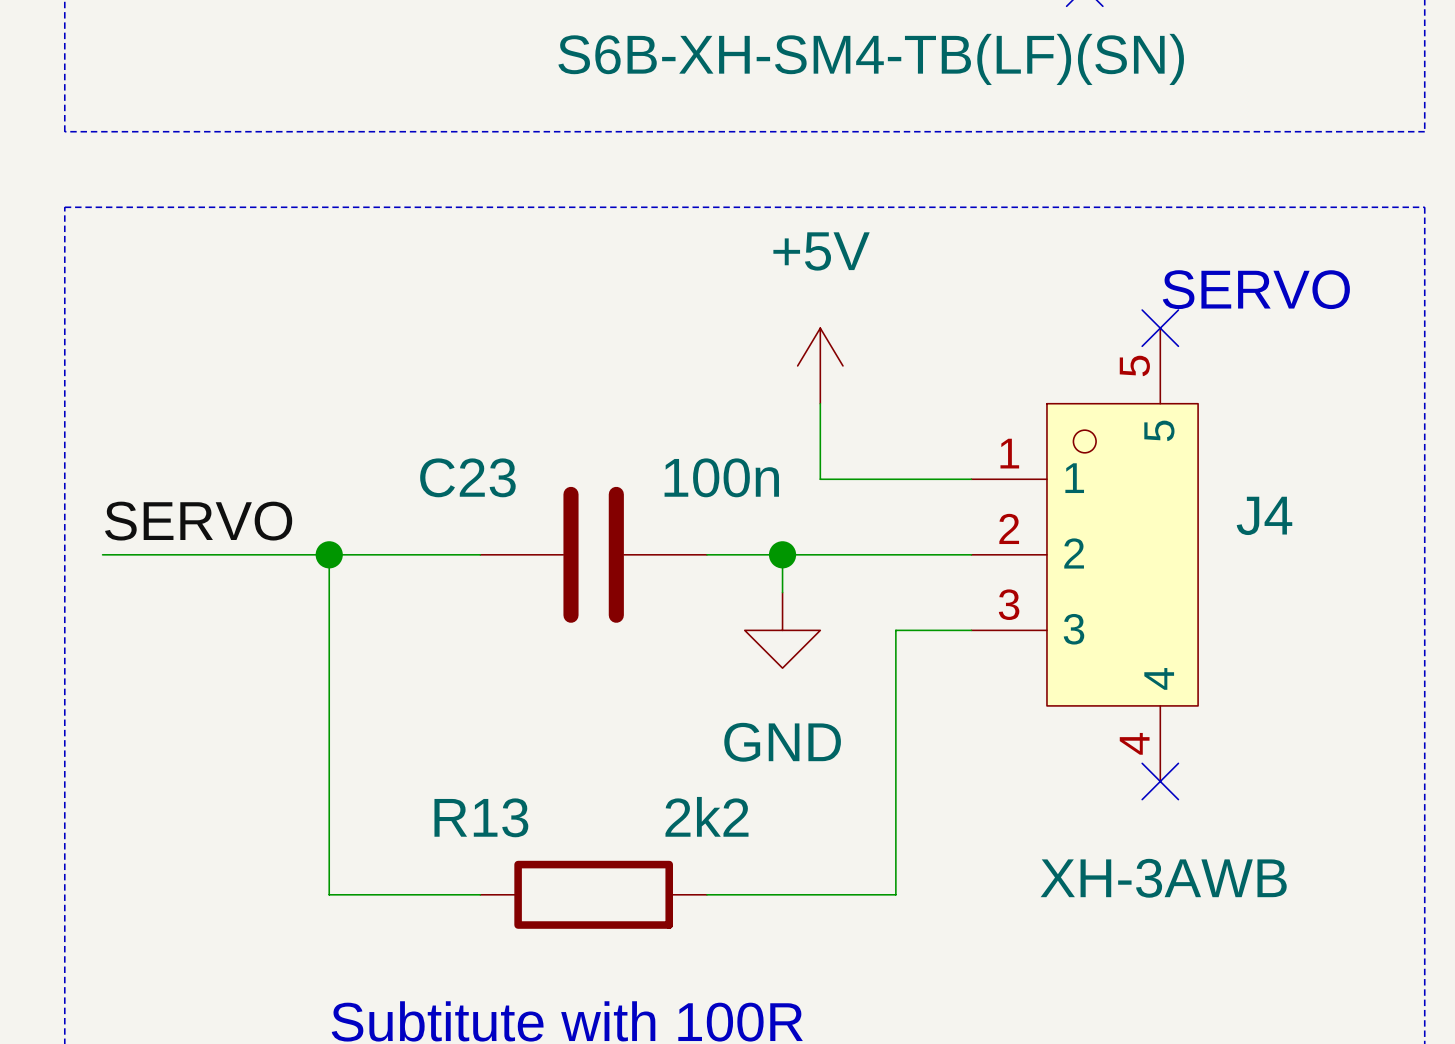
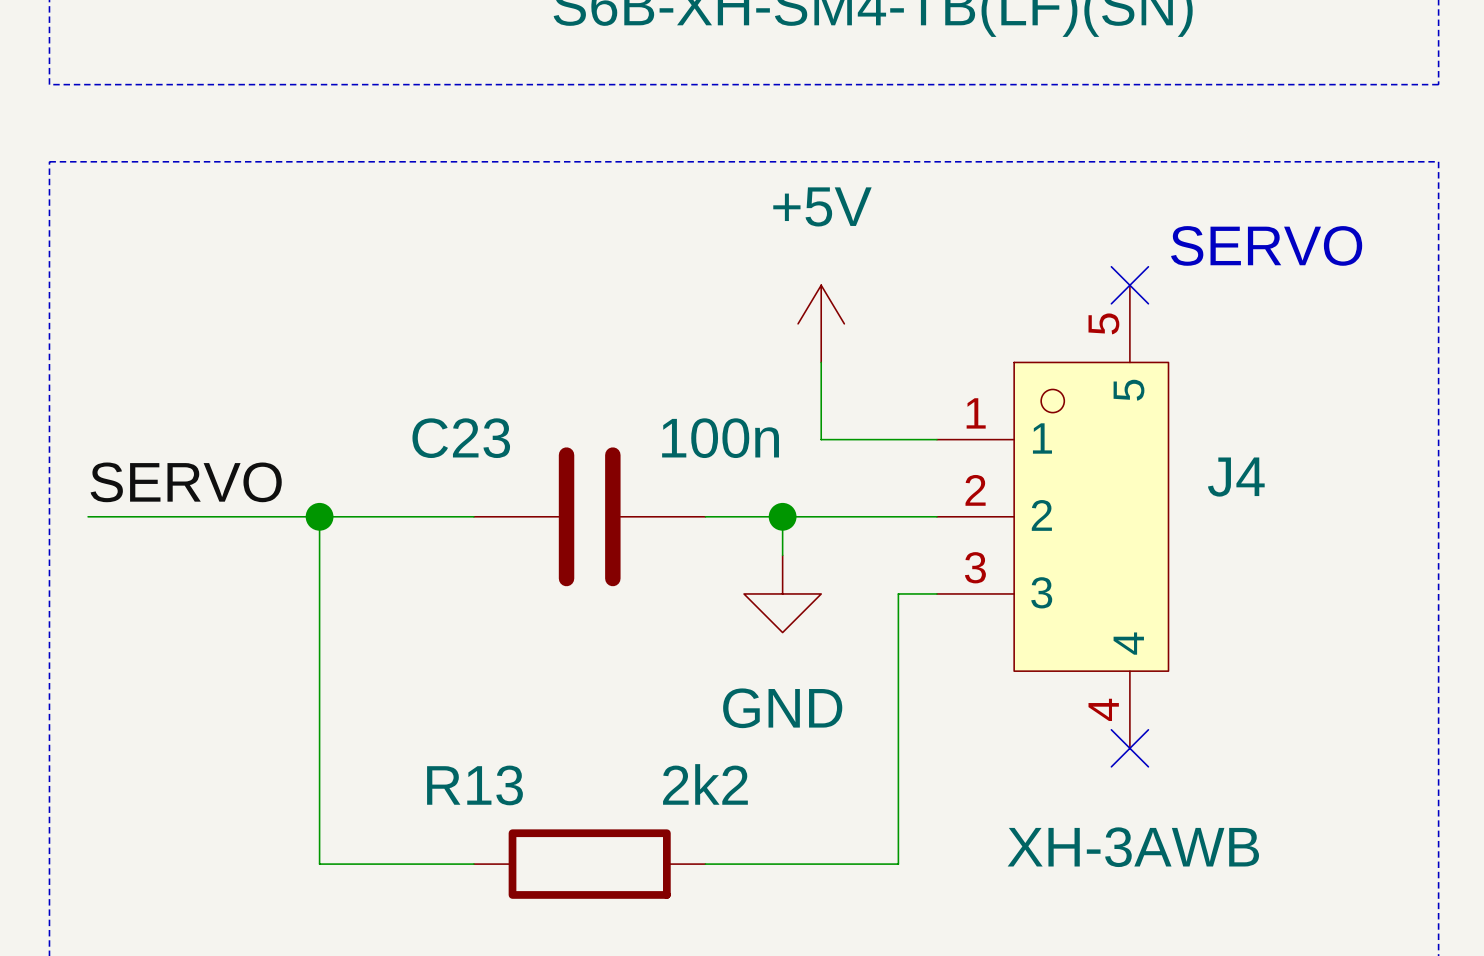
no-connect mark position: (1160, 328) -> (1129, 285)
J4 position: (1084, 554) -> (1052, 516)
no-connect mark position: (1160, 781) -> (1129, 748)

